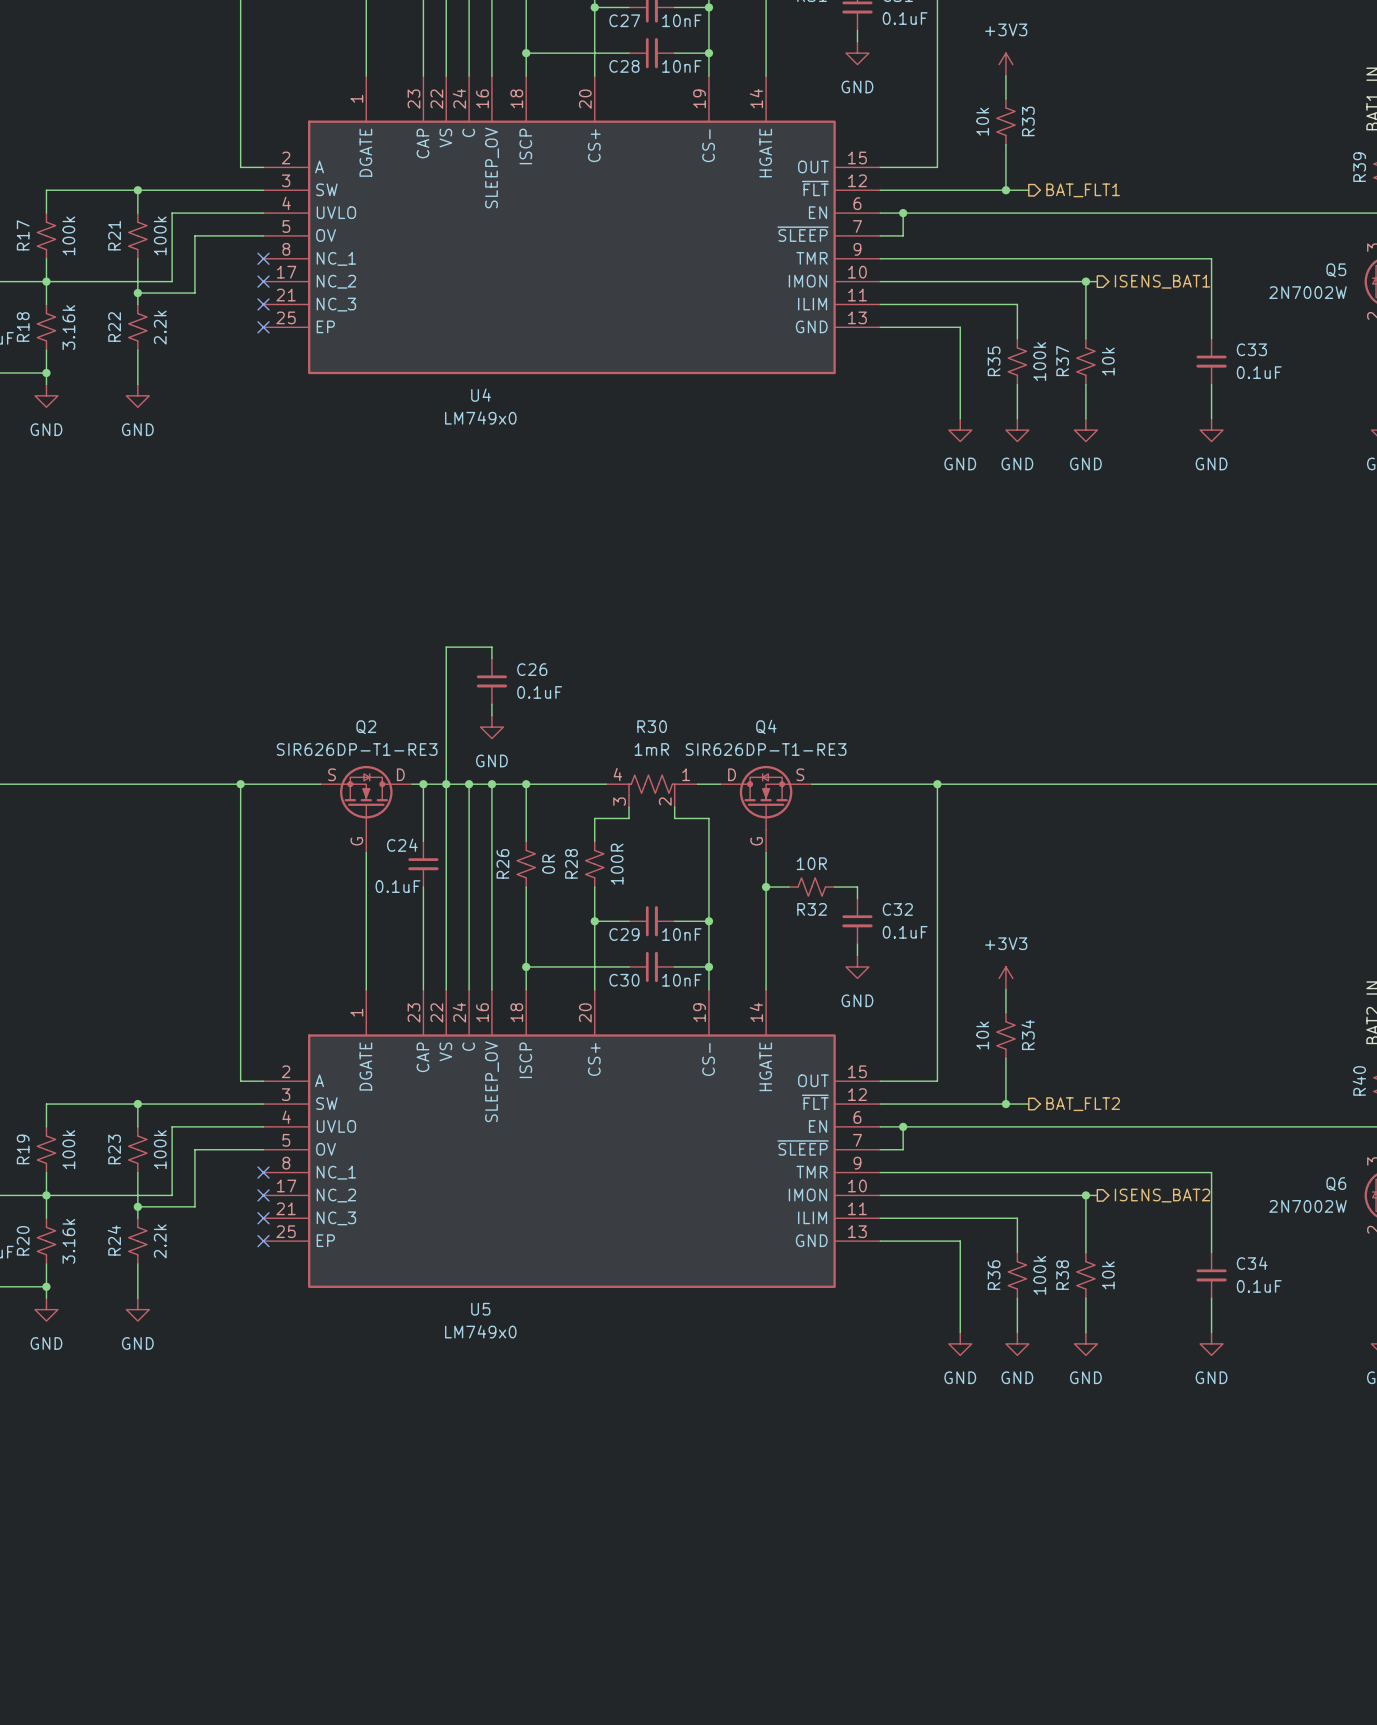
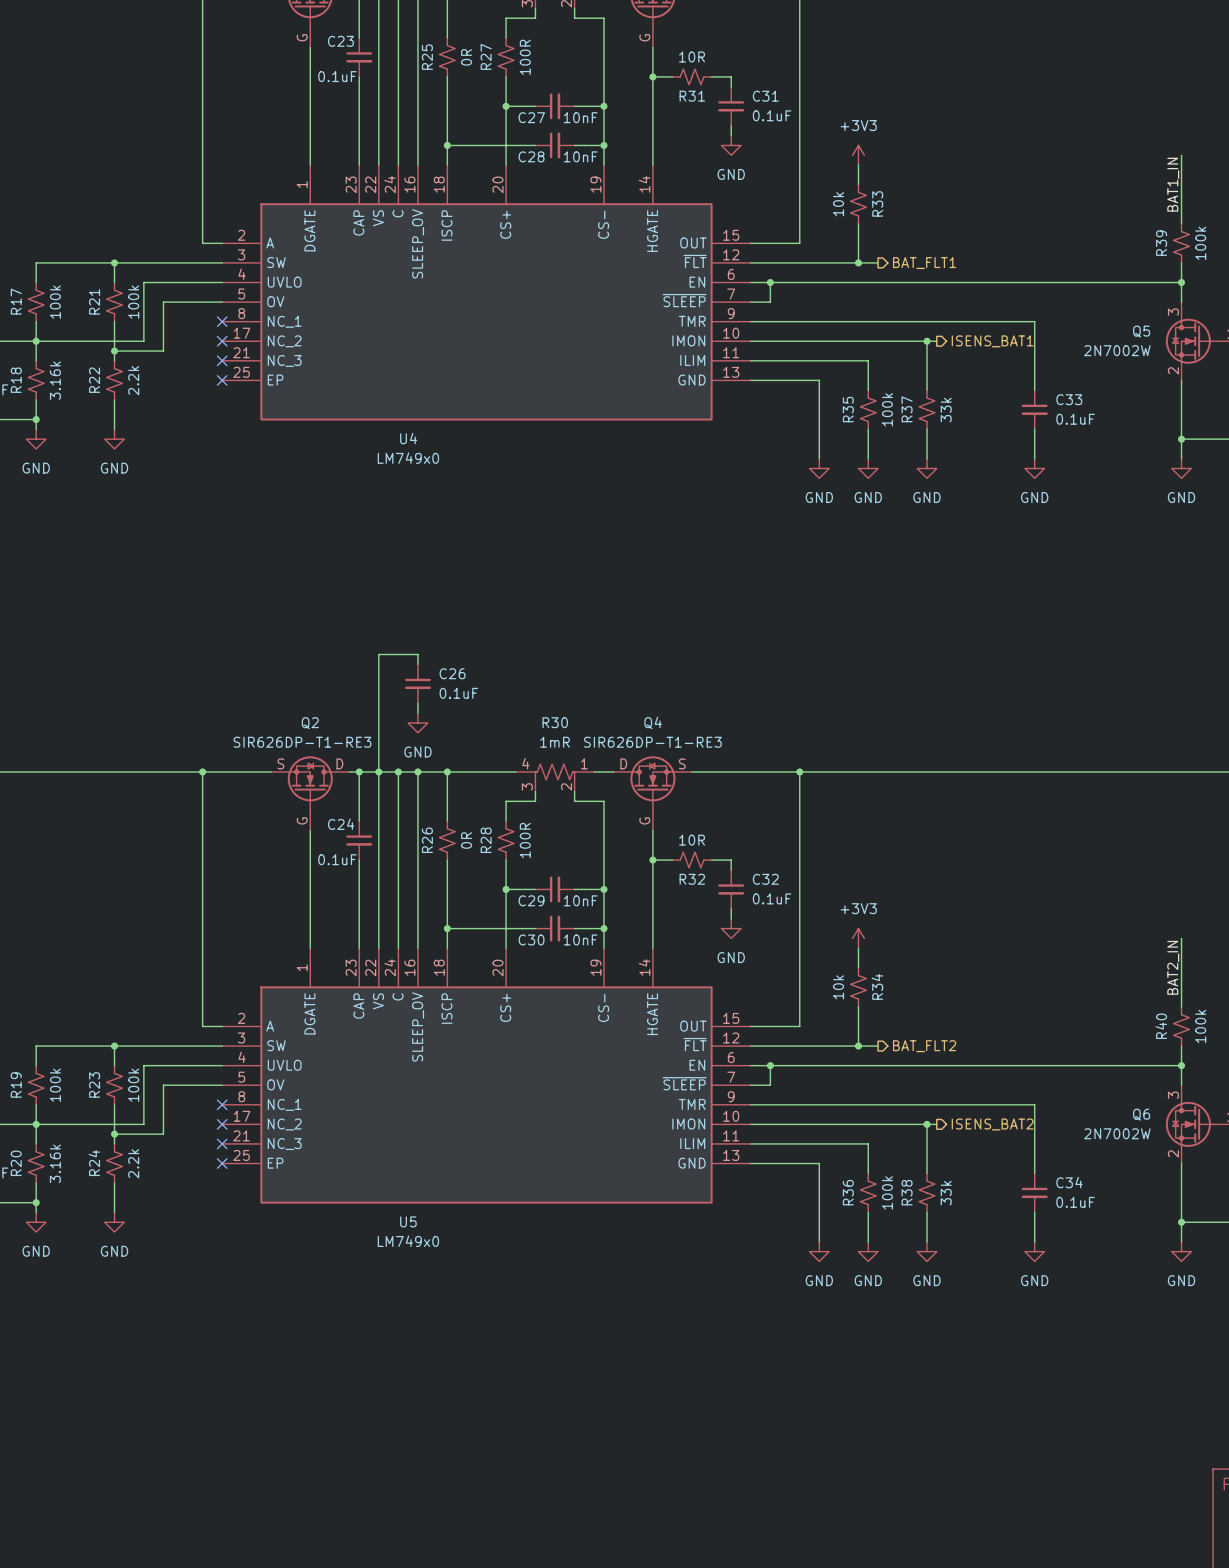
R37 value: 10k (1108, 361) -> 33k (946, 410)
R38 value: 10k (1108, 1275) -> 33k (946, 1193)

